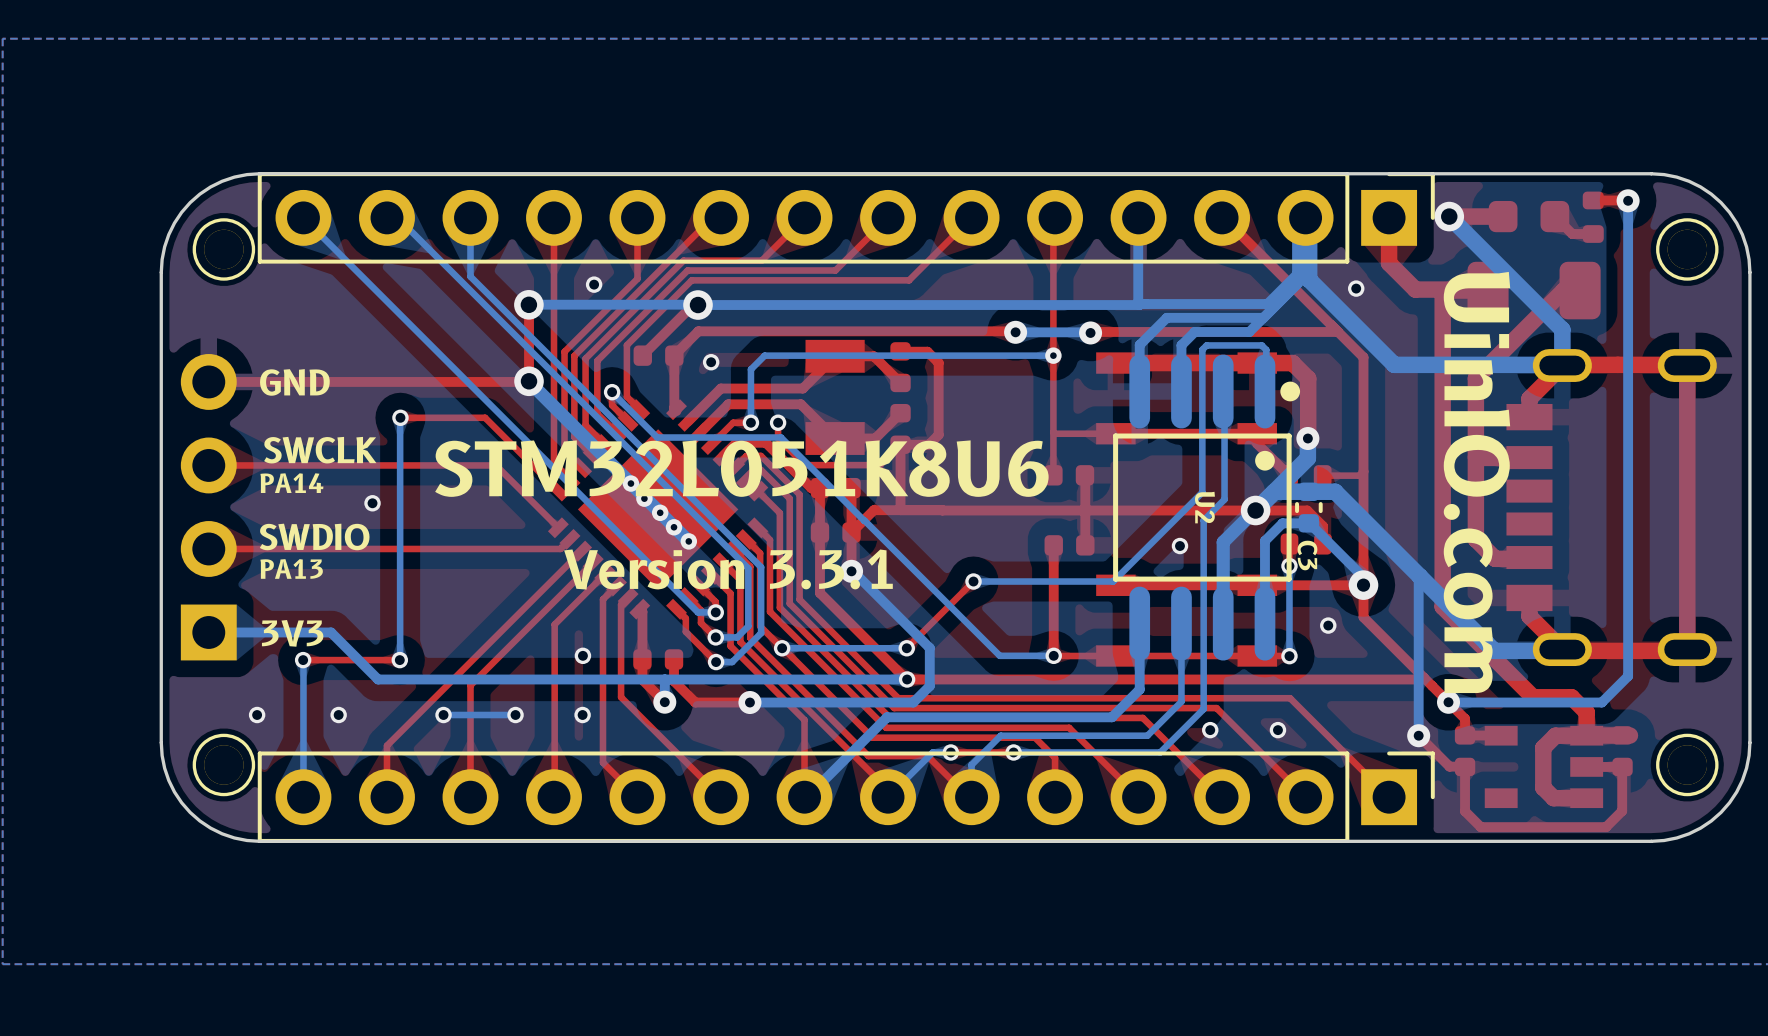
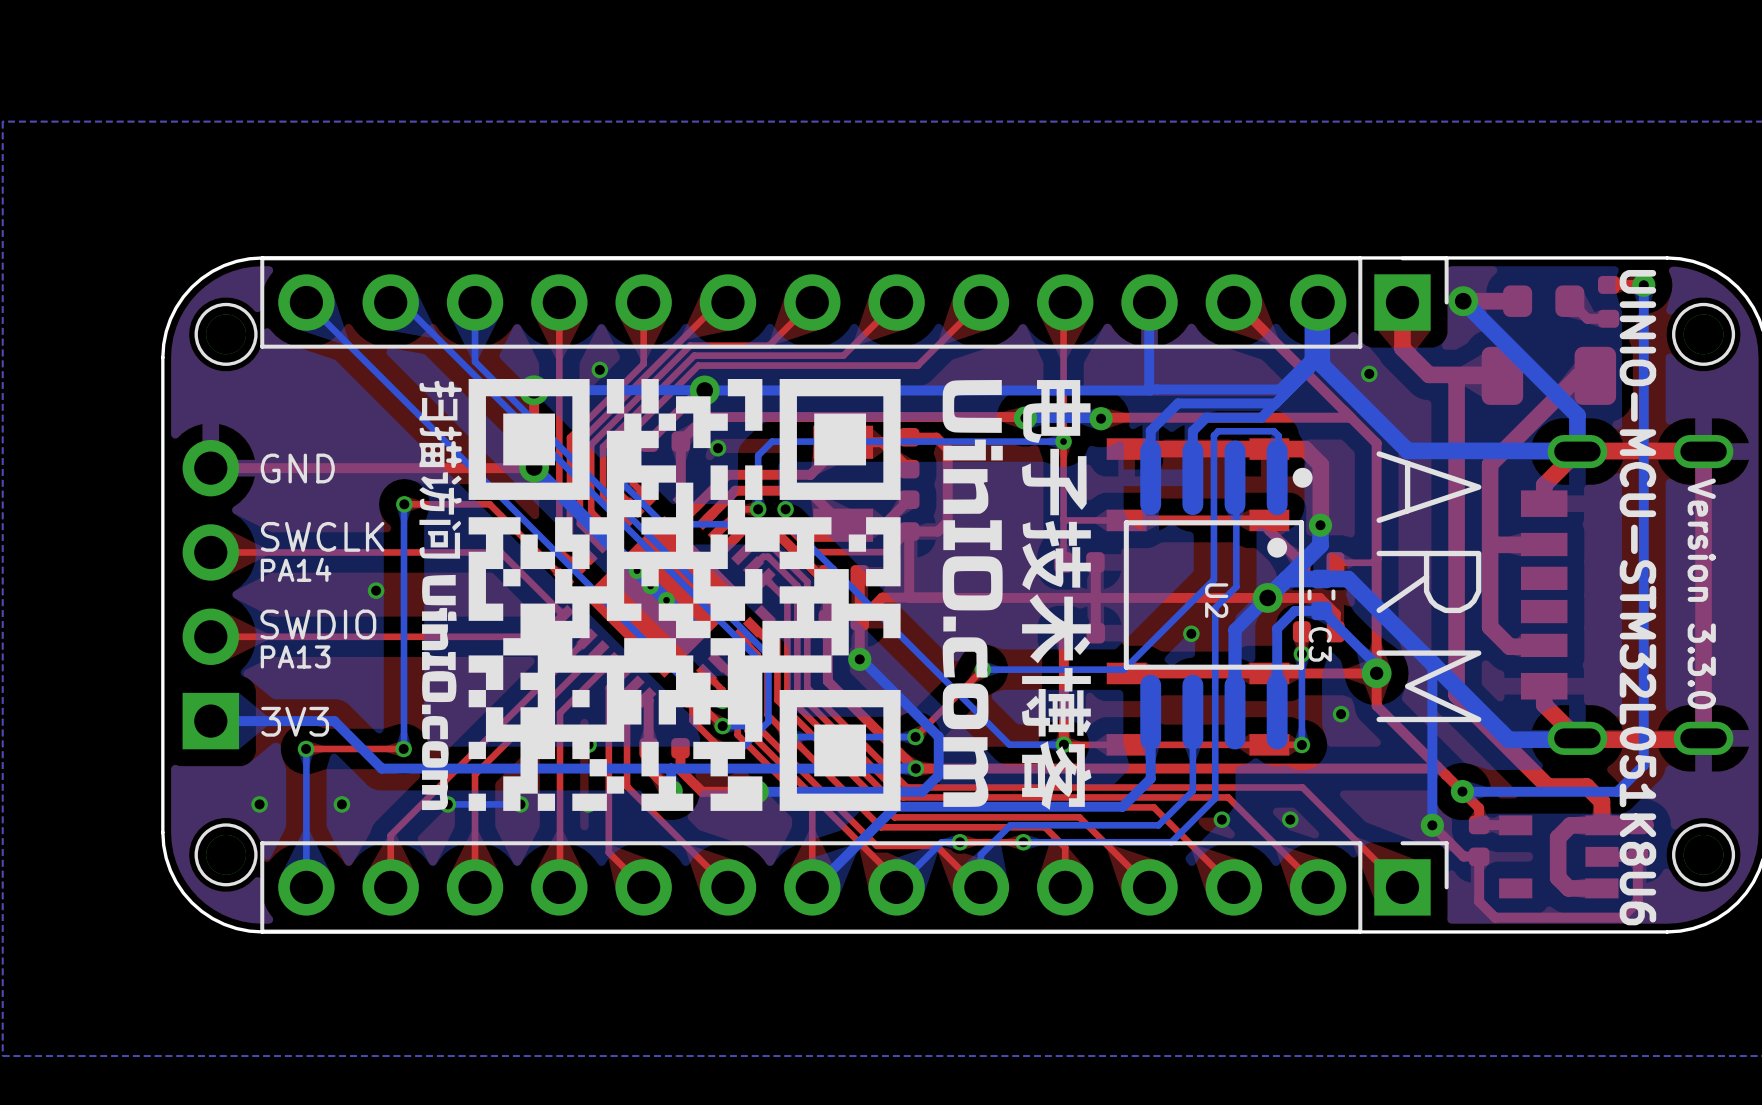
drawing: none -> [419, 378, 901, 811]
drawing: none -> [942, 379, 1092, 810]
text: STM32L051K8U6 (741, 468) -> none
text: UinIO.com (1476, 482) -> none
text: none -> ARM (1428, 586)
text: none -> Version 3.3.0 (1701, 593)
text: none -> UINIO-MCU-STM32L051K8U6 (1637, 597)
text: Version 3.3.1 (728, 569) -> none

